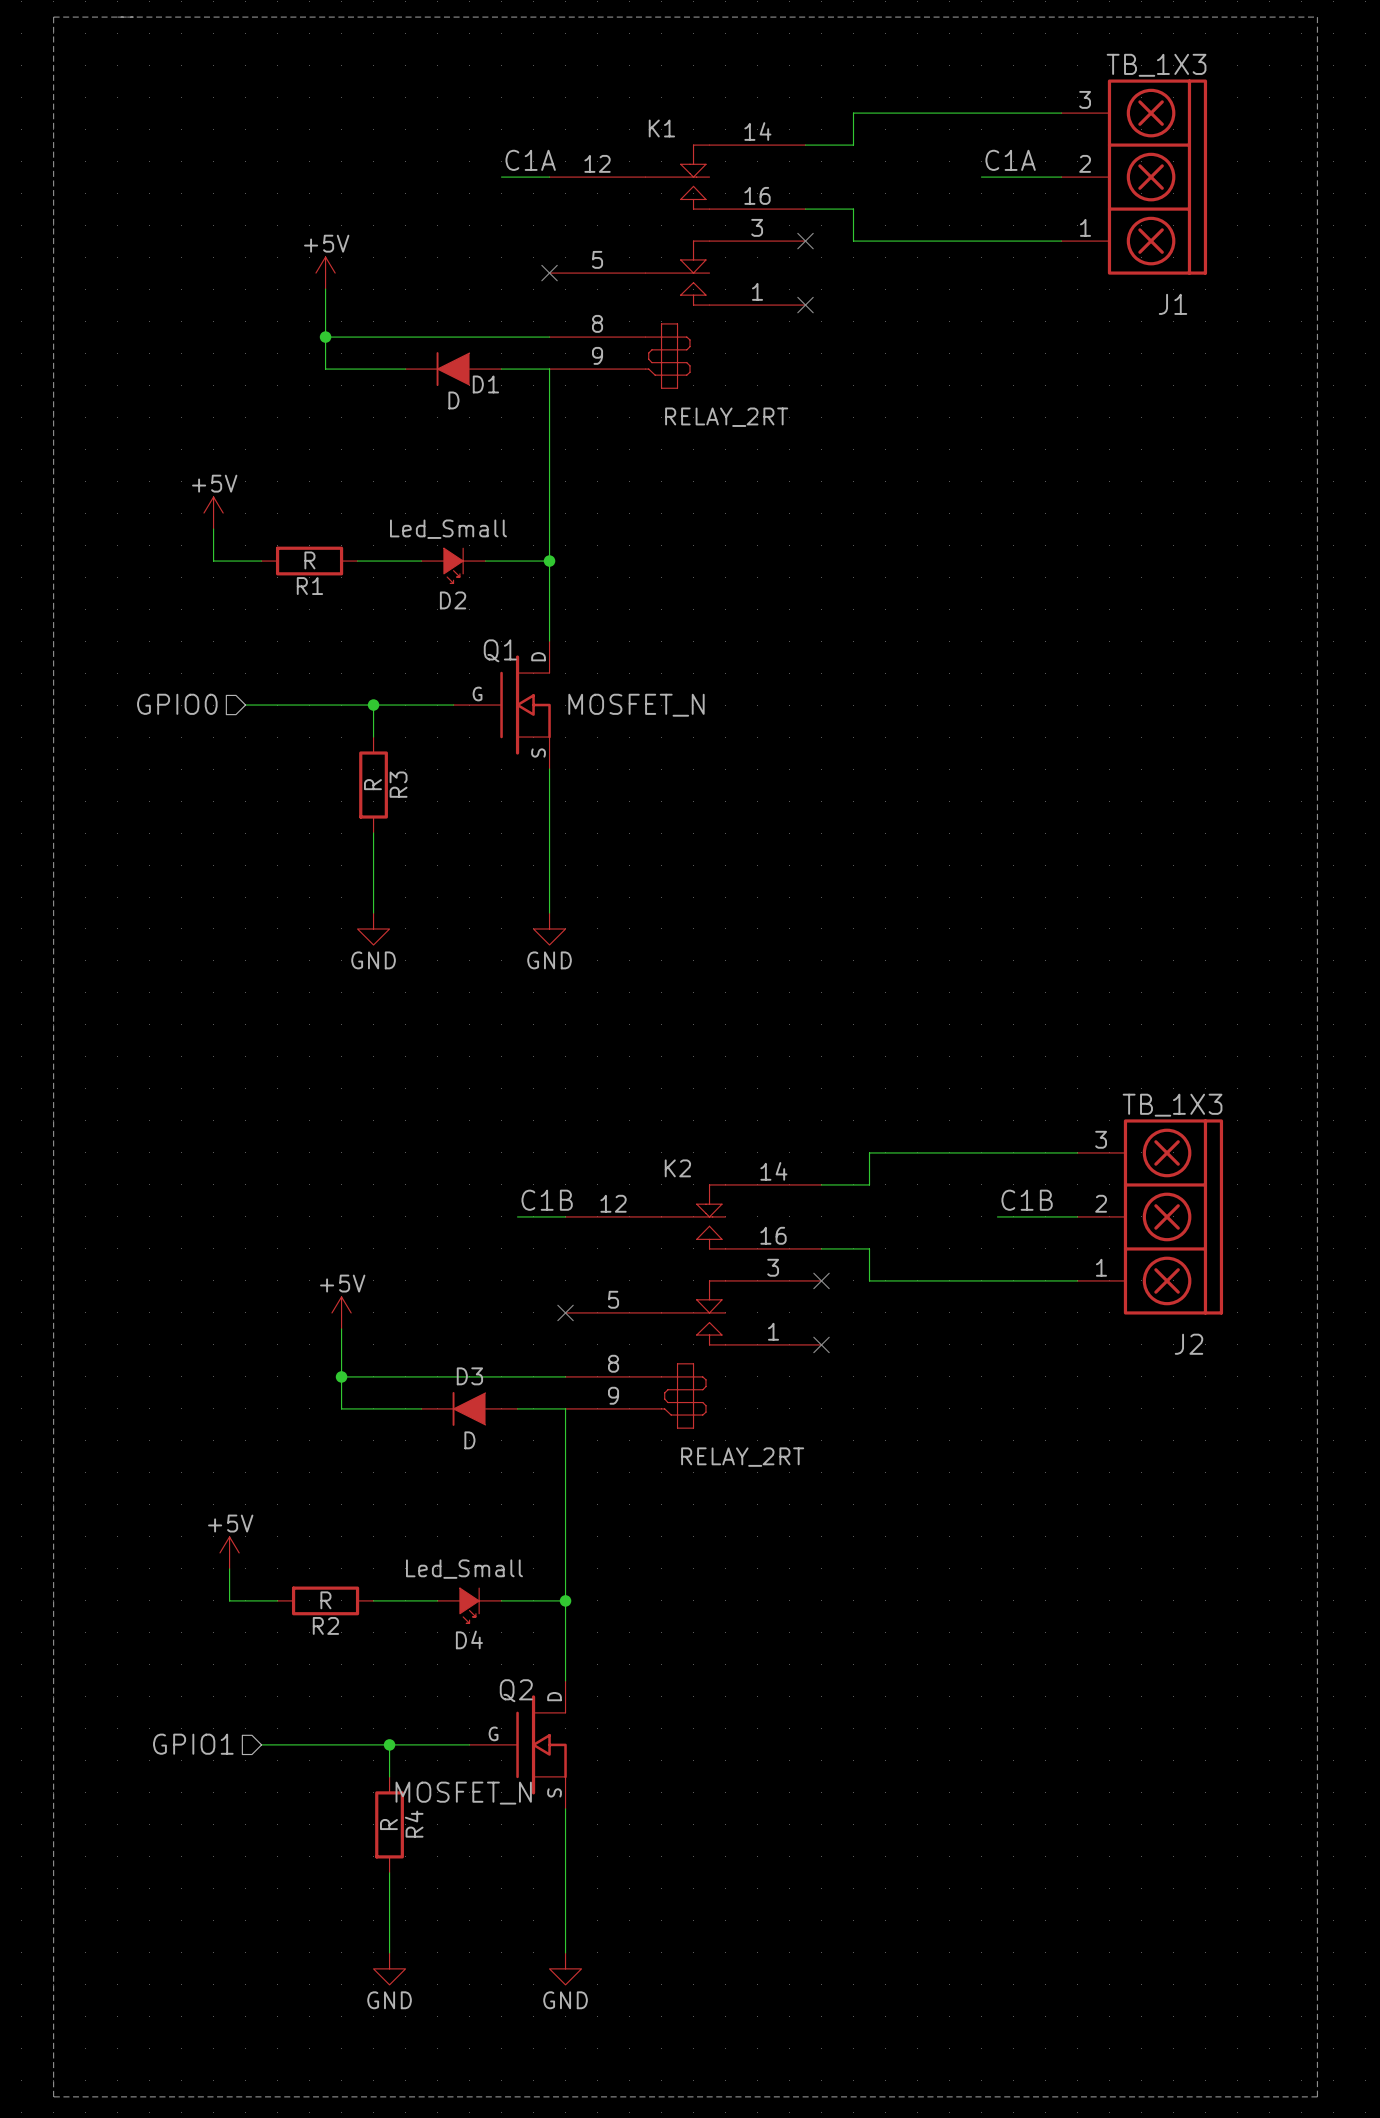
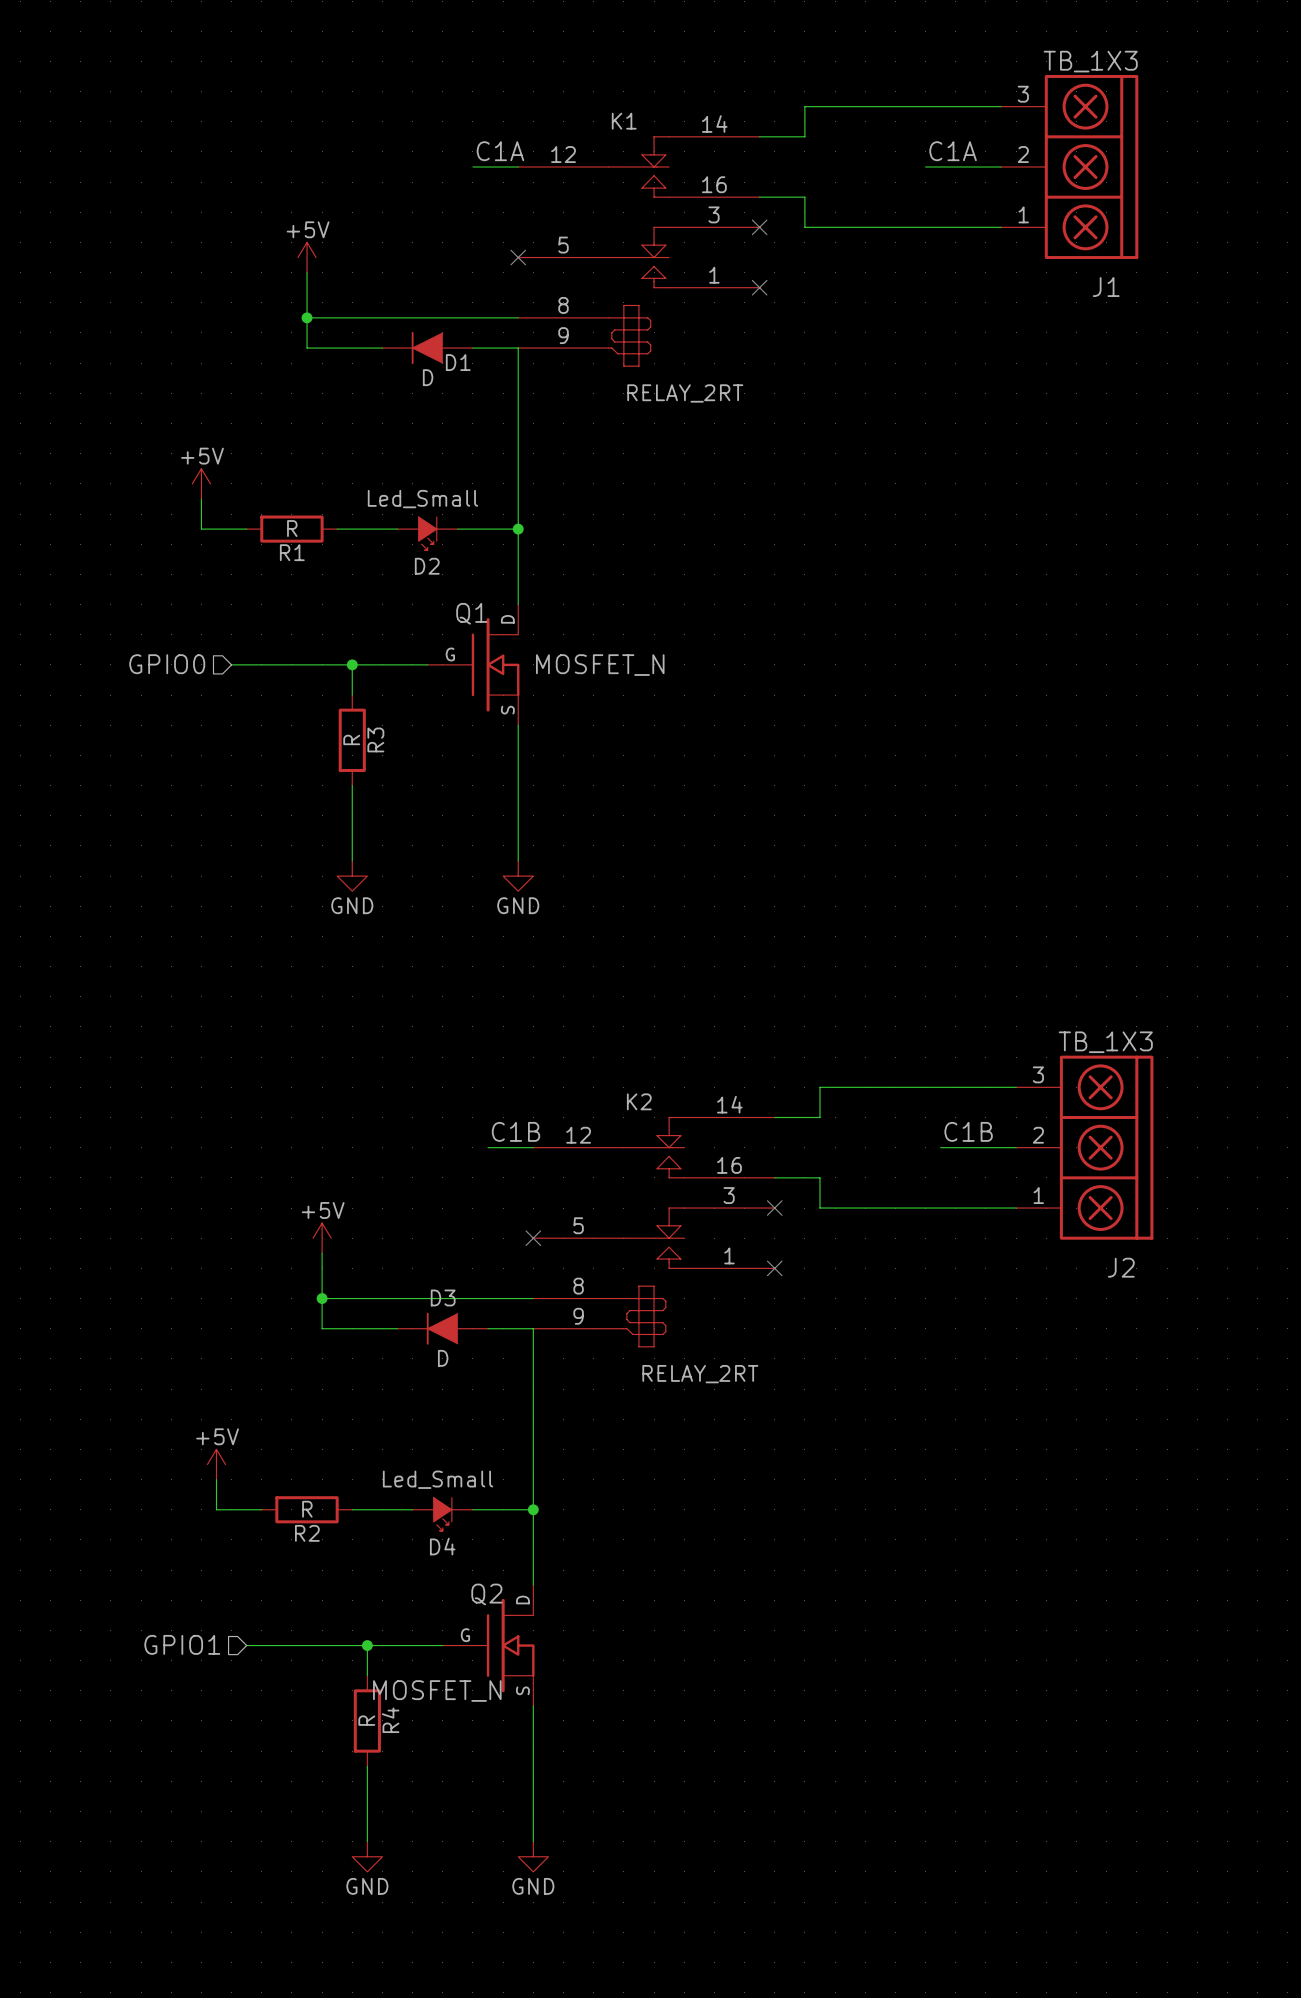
line: (53, 17) (1317, 17) (1317, 2096) (53, 2096) (53, 17) -> none

